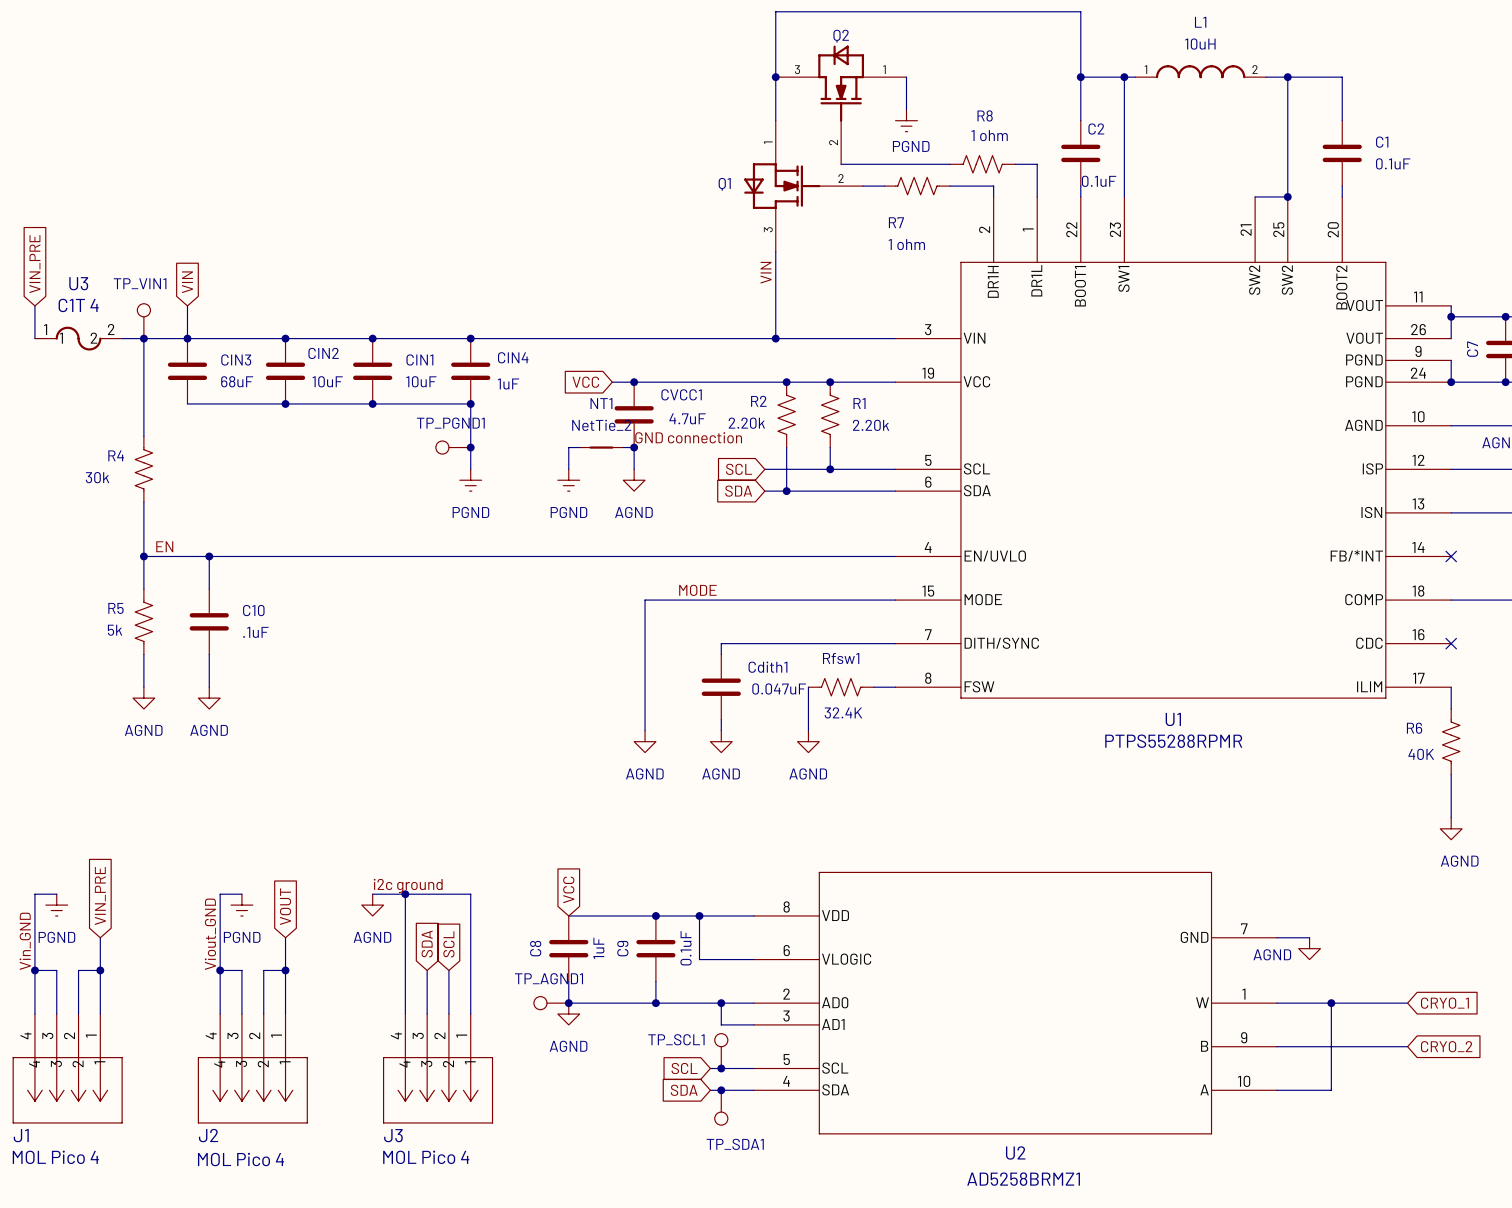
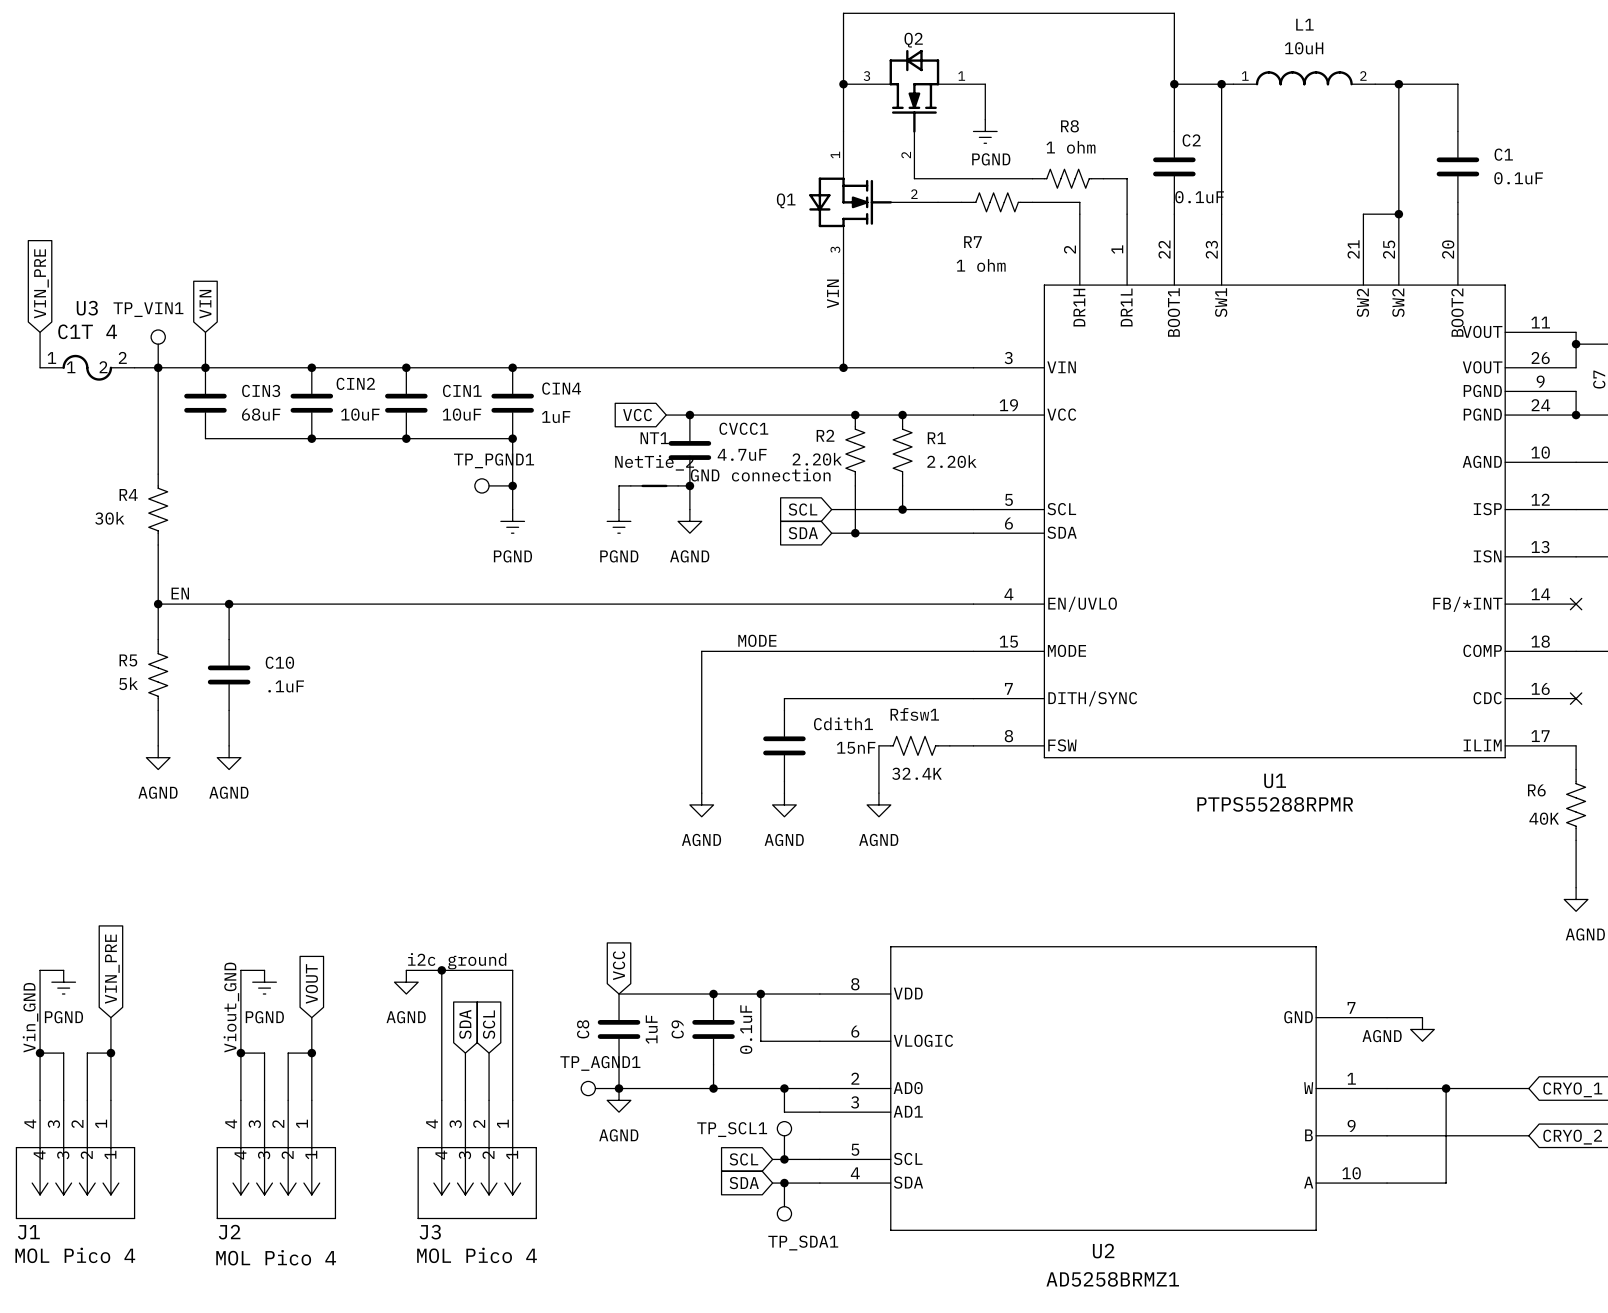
Cdith1 value: 0.047uF (779, 688) -> 15nF (856, 747)

